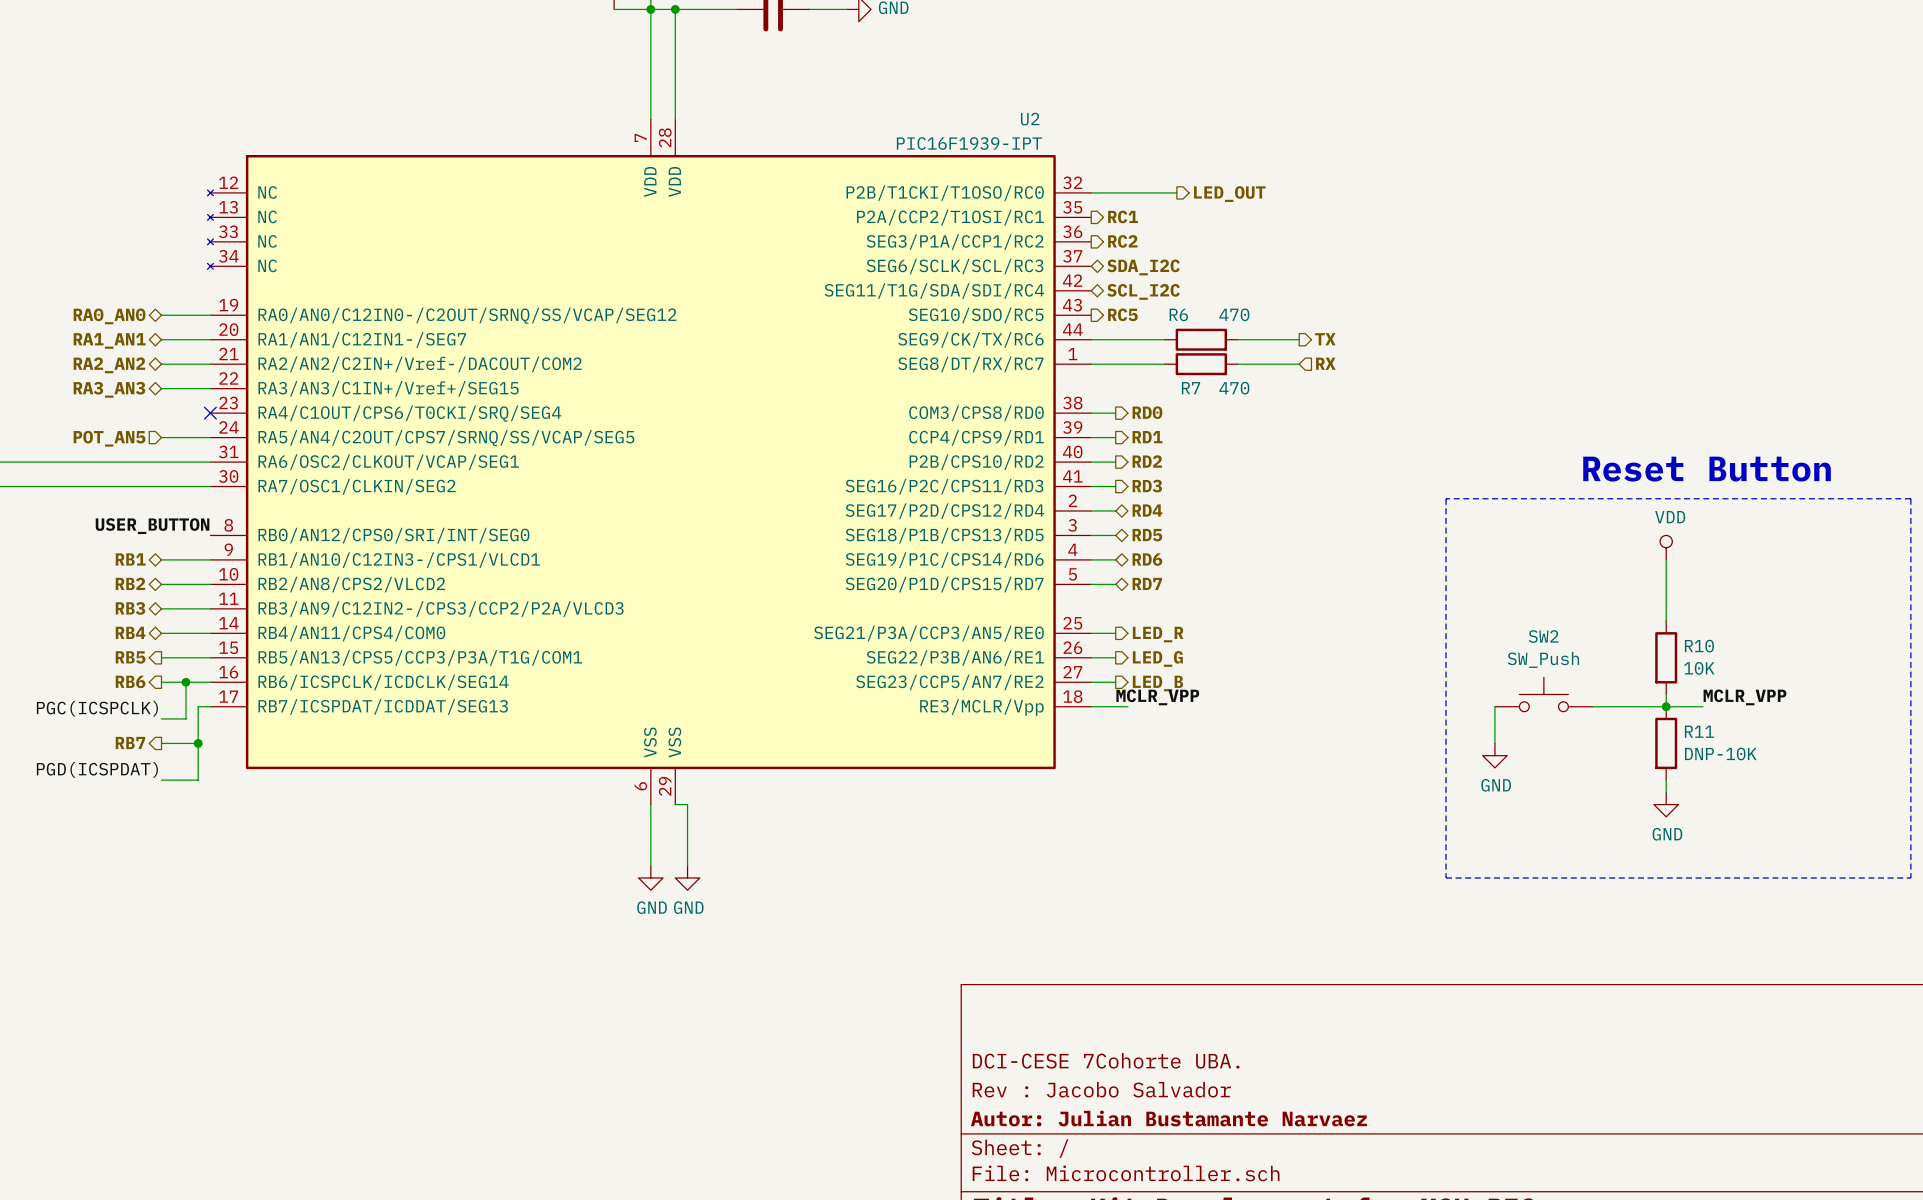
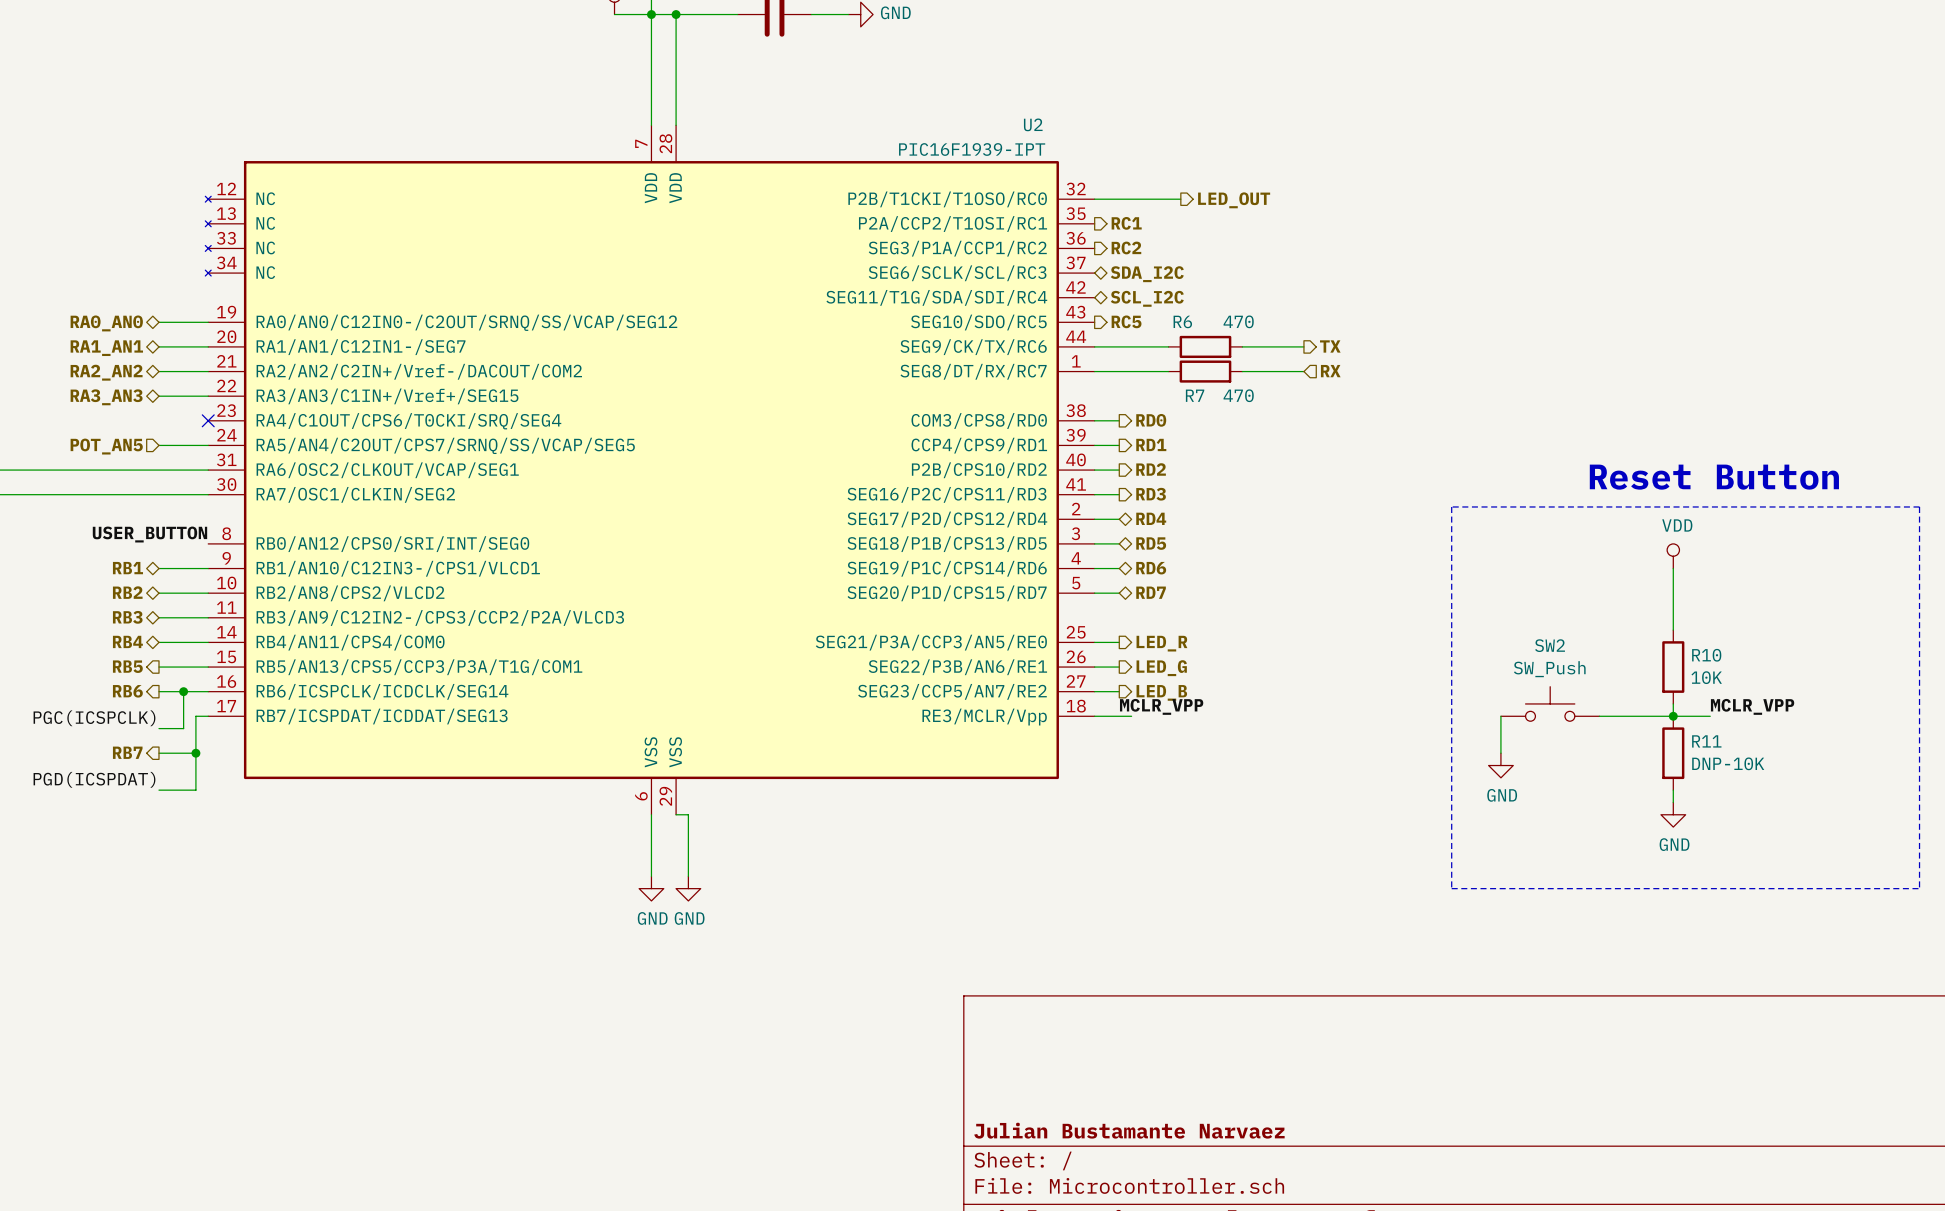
title block: DCI-CESE 7Cohorte UBA. (1106, 1060) -> none
title block: Rev : Jacobo Salvador (1101, 1089) -> none
title block: Autor: Julian Bustamante Narvaez (1168, 1118) -> Julian Bustamante Narvaez (1129, 1130)

